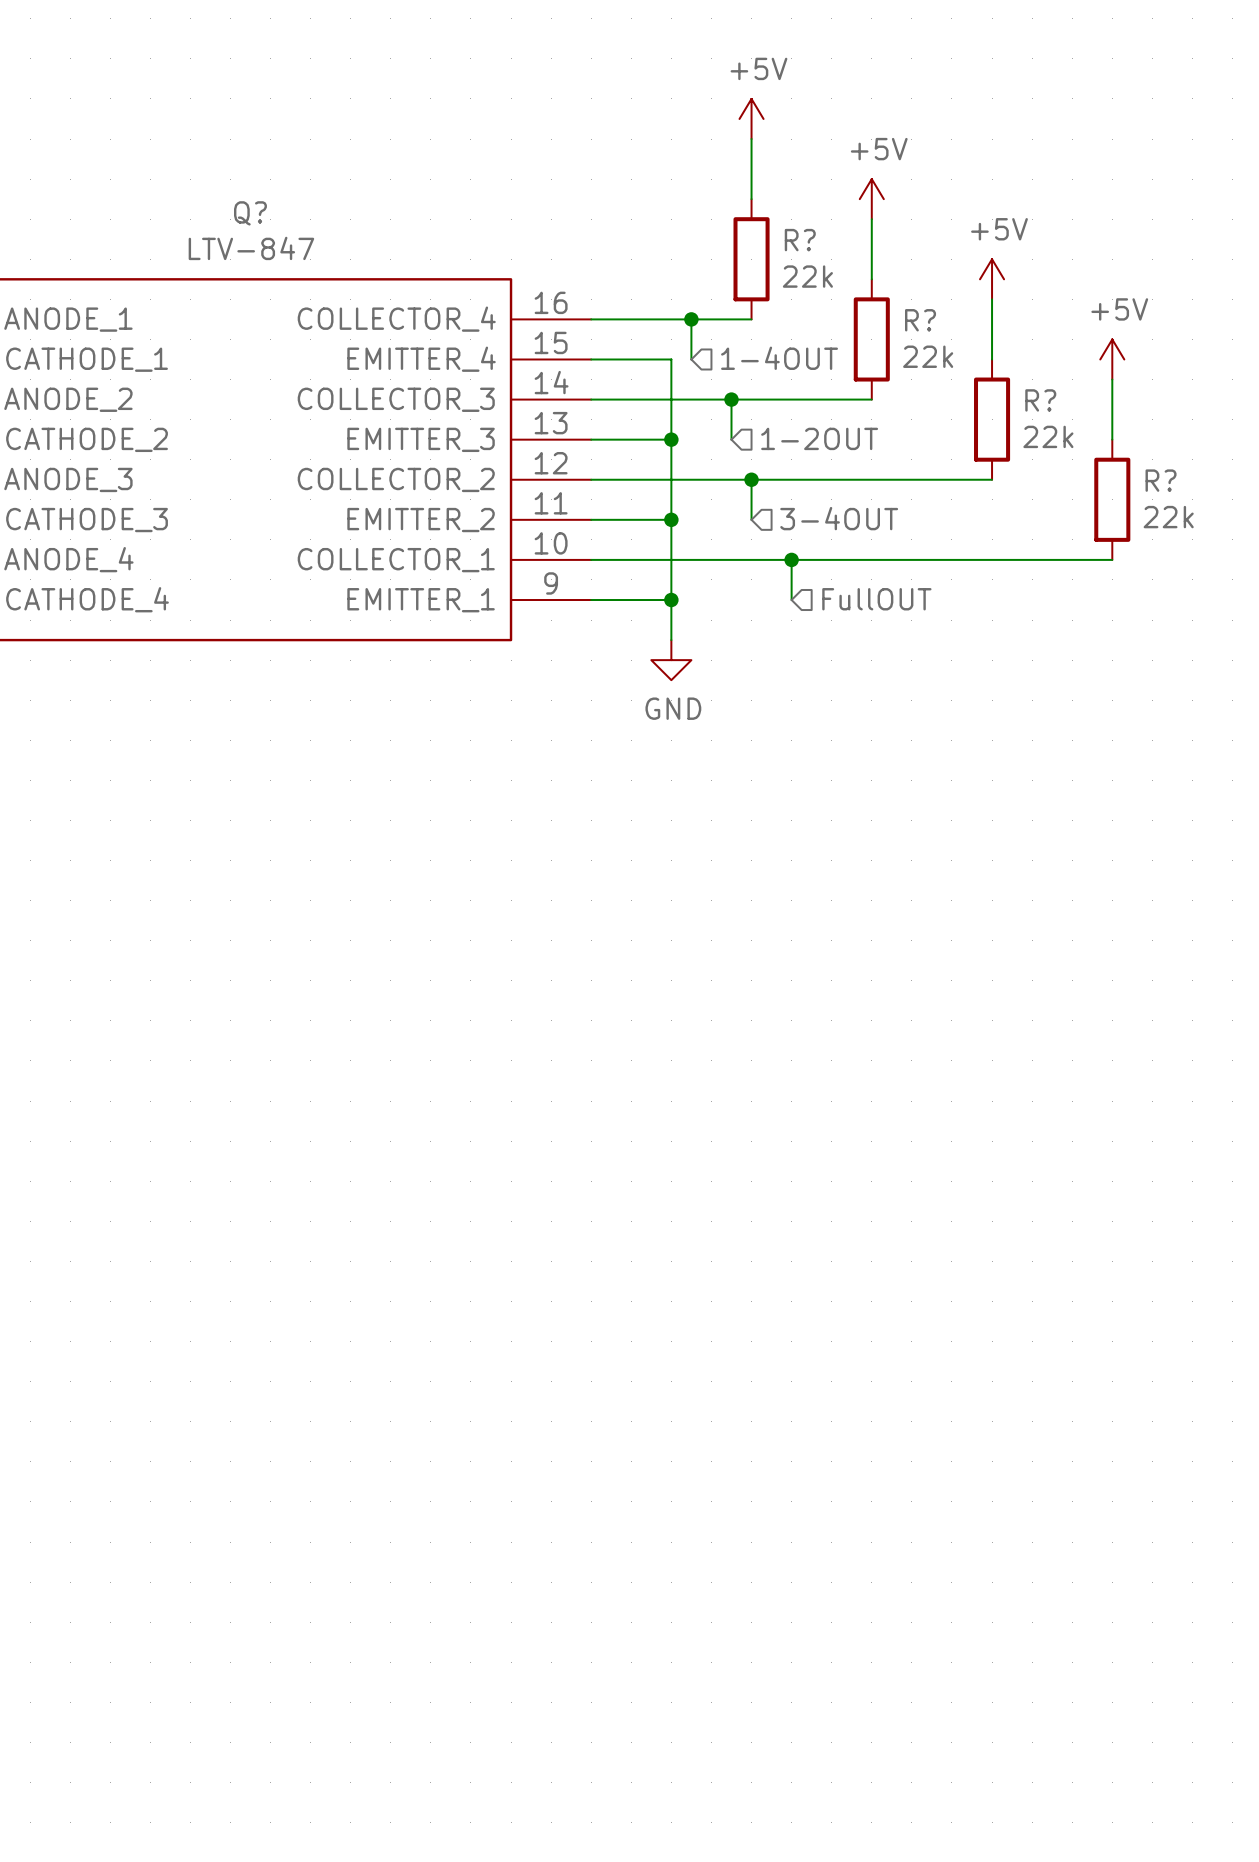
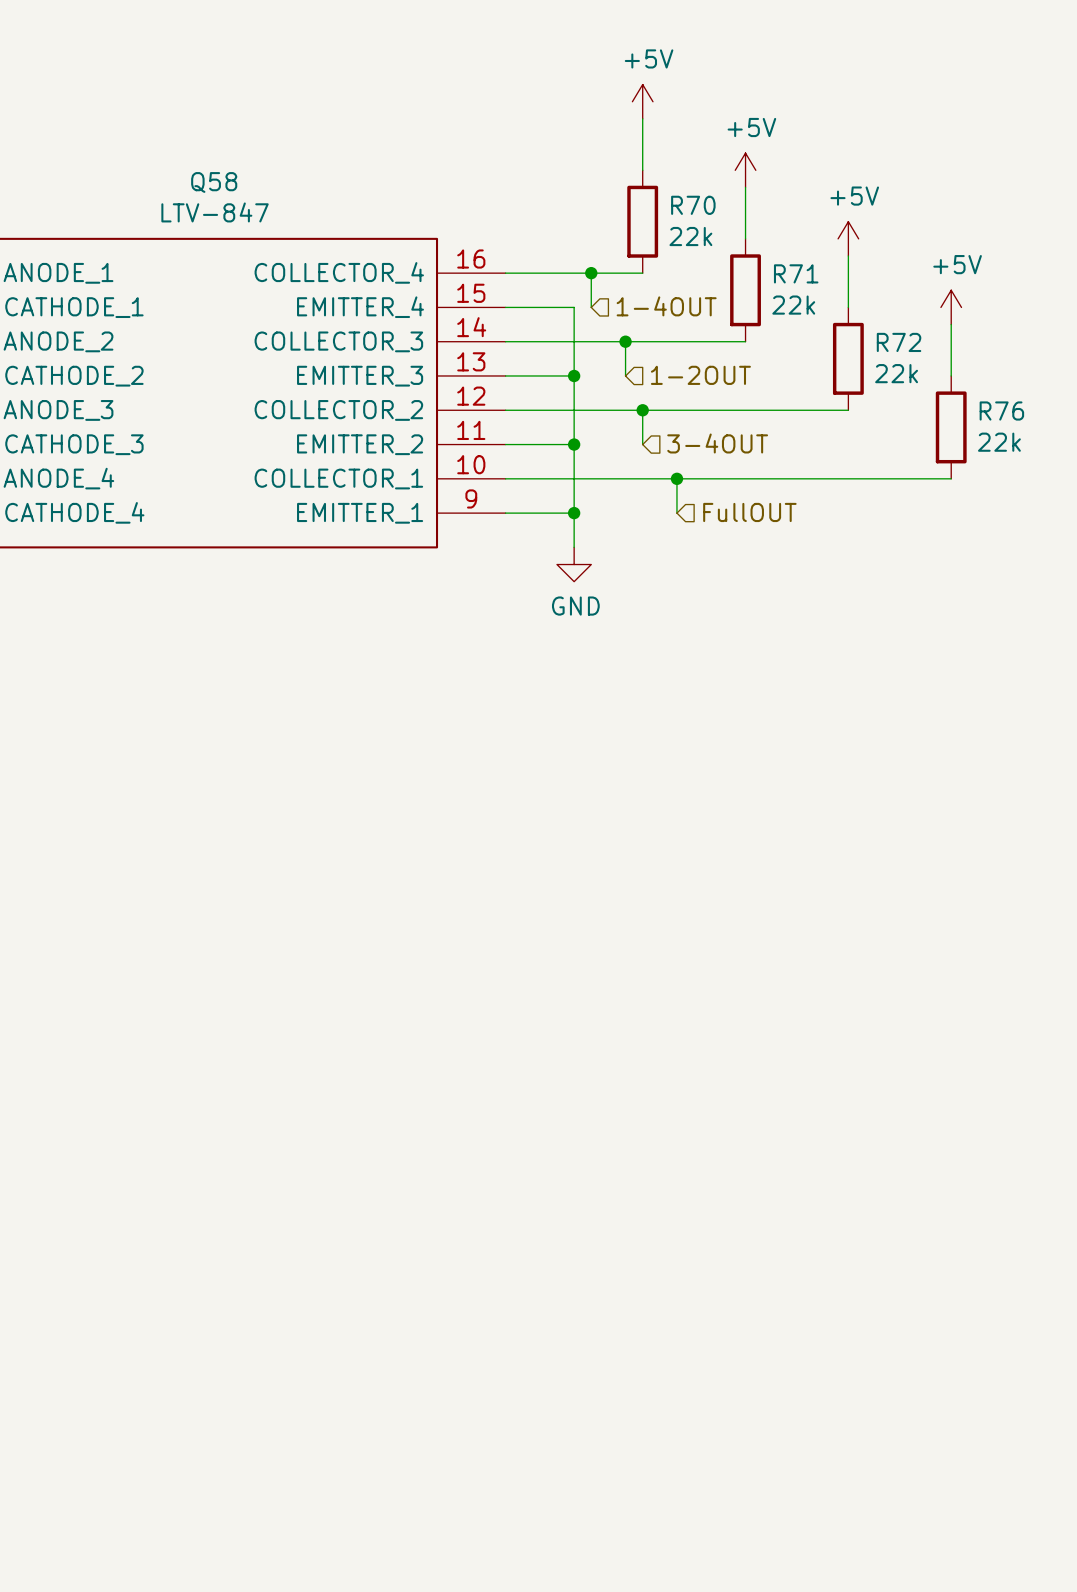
Q? name: Q? (250, 213) -> Q58 (214, 182)
R? name: R? (800, 240) -> R70 (693, 205)
R? name: R? (920, 320) -> R71 (796, 273)
R? name: R? (1040, 400) -> R72 (899, 342)
R? name: R? (1161, 480) -> R76 (1001, 411)

